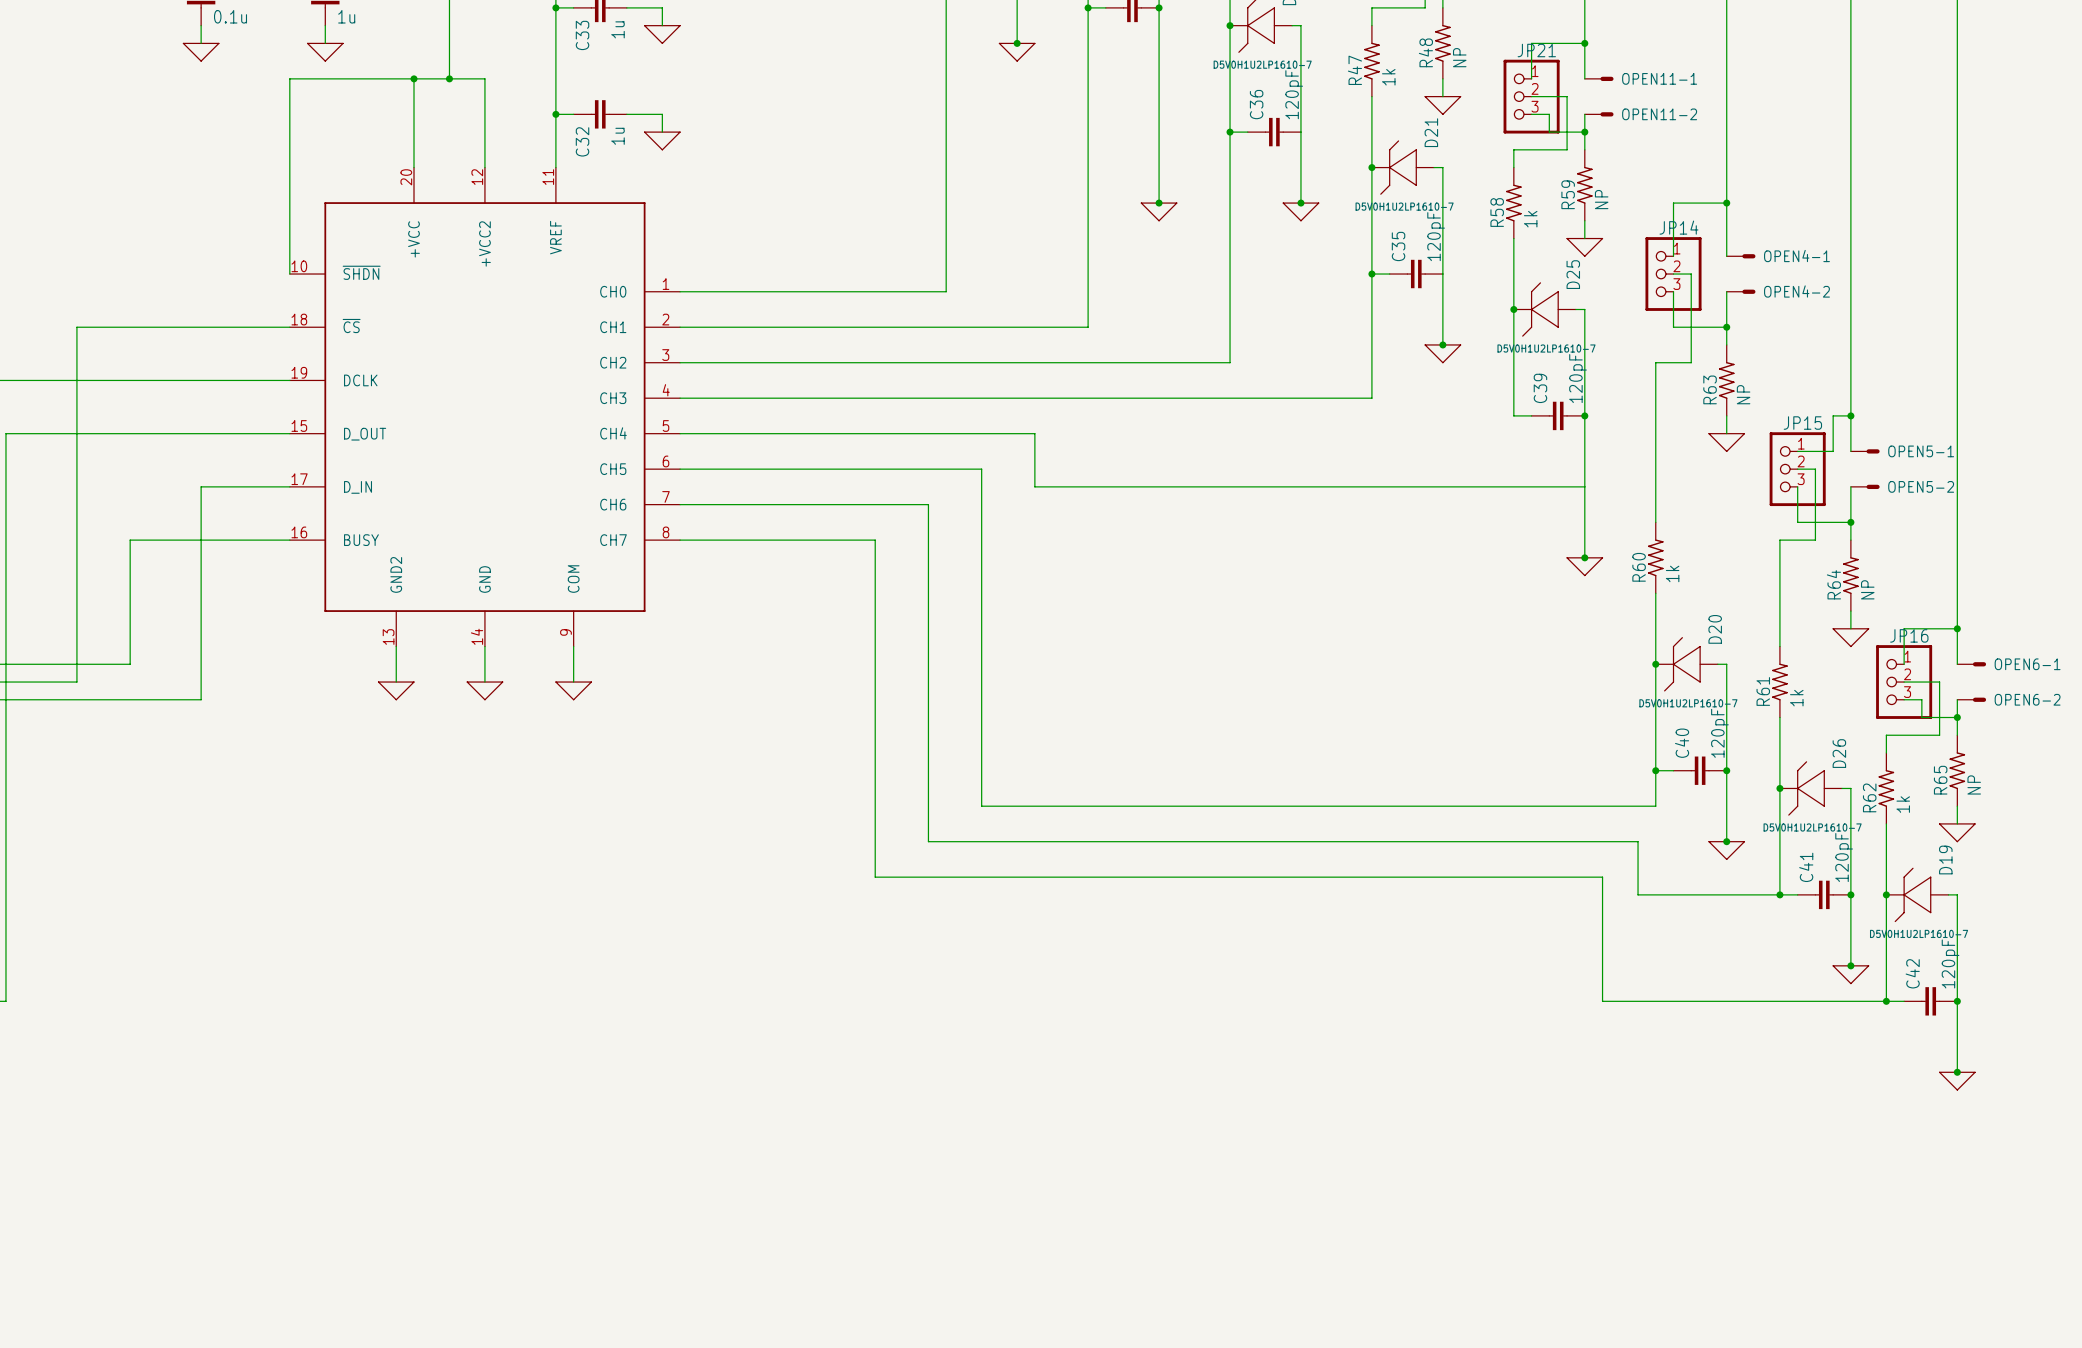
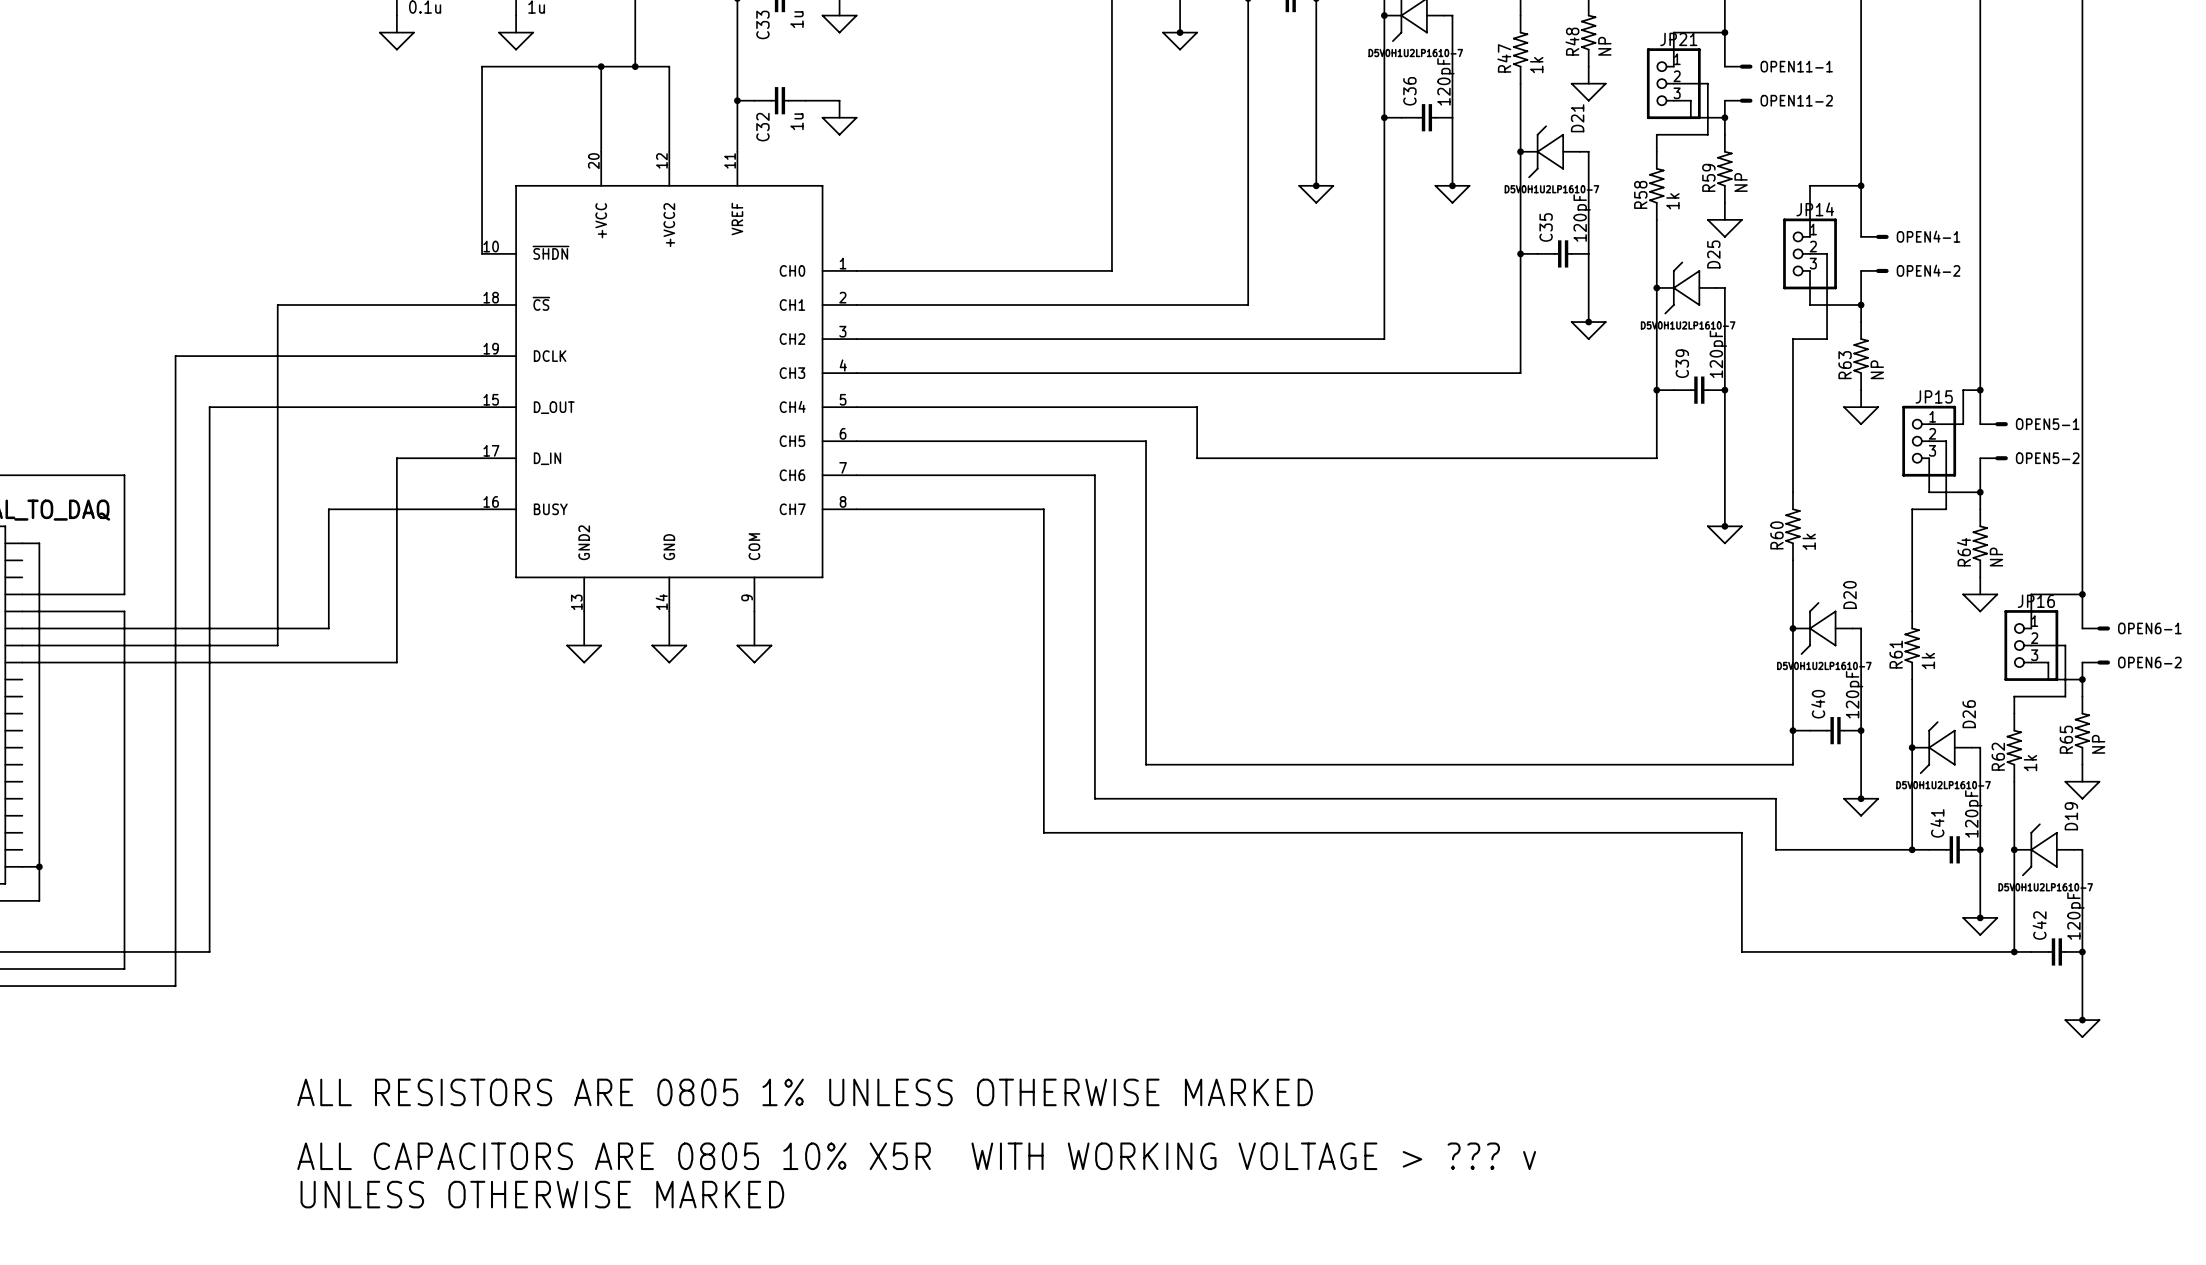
junction: none -> (1656, 390)
wire: (1513, 486) (1584, 486) -> (1656, 458) (1656, 390)
text: none -> ALL RESISTORS ARE 0805 1% UNLESS OTHERWISE MARKED (805, 1092)
text: none -> ALL CAPACITORS ARE 0805 10% X5R WITH WORKING VOLTAGE > ??? v (916, 1156)
text: none -> UNLESS OTHERWISE MARKED (542, 1194)

